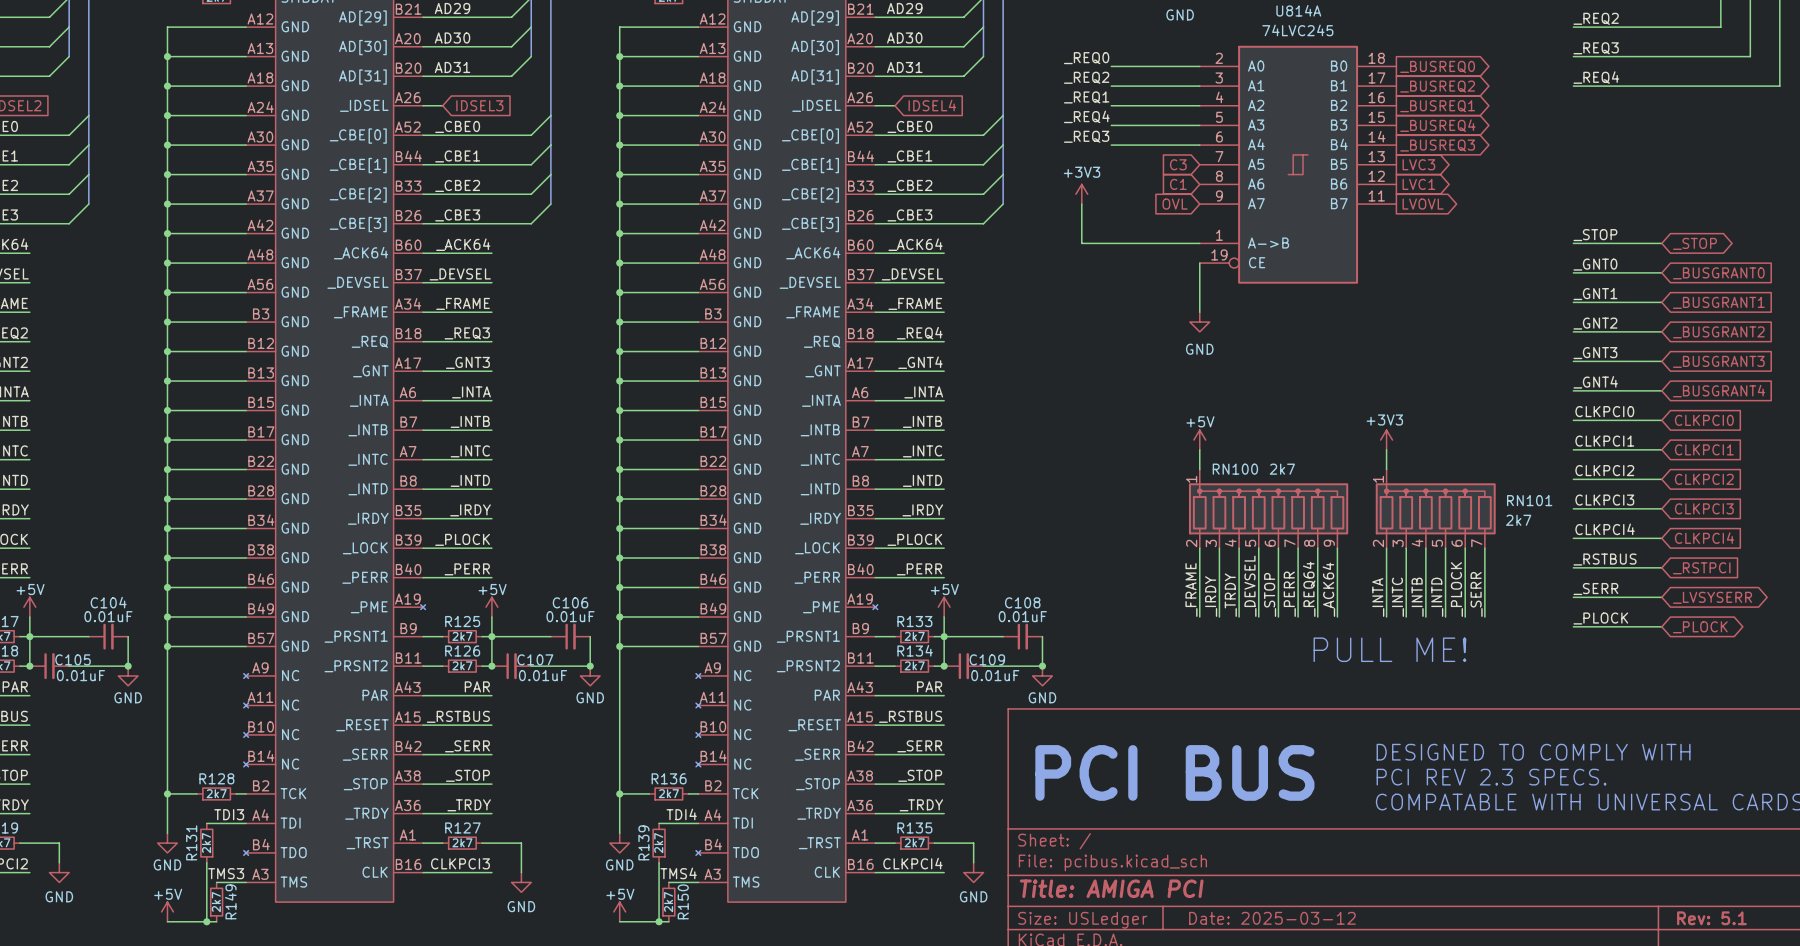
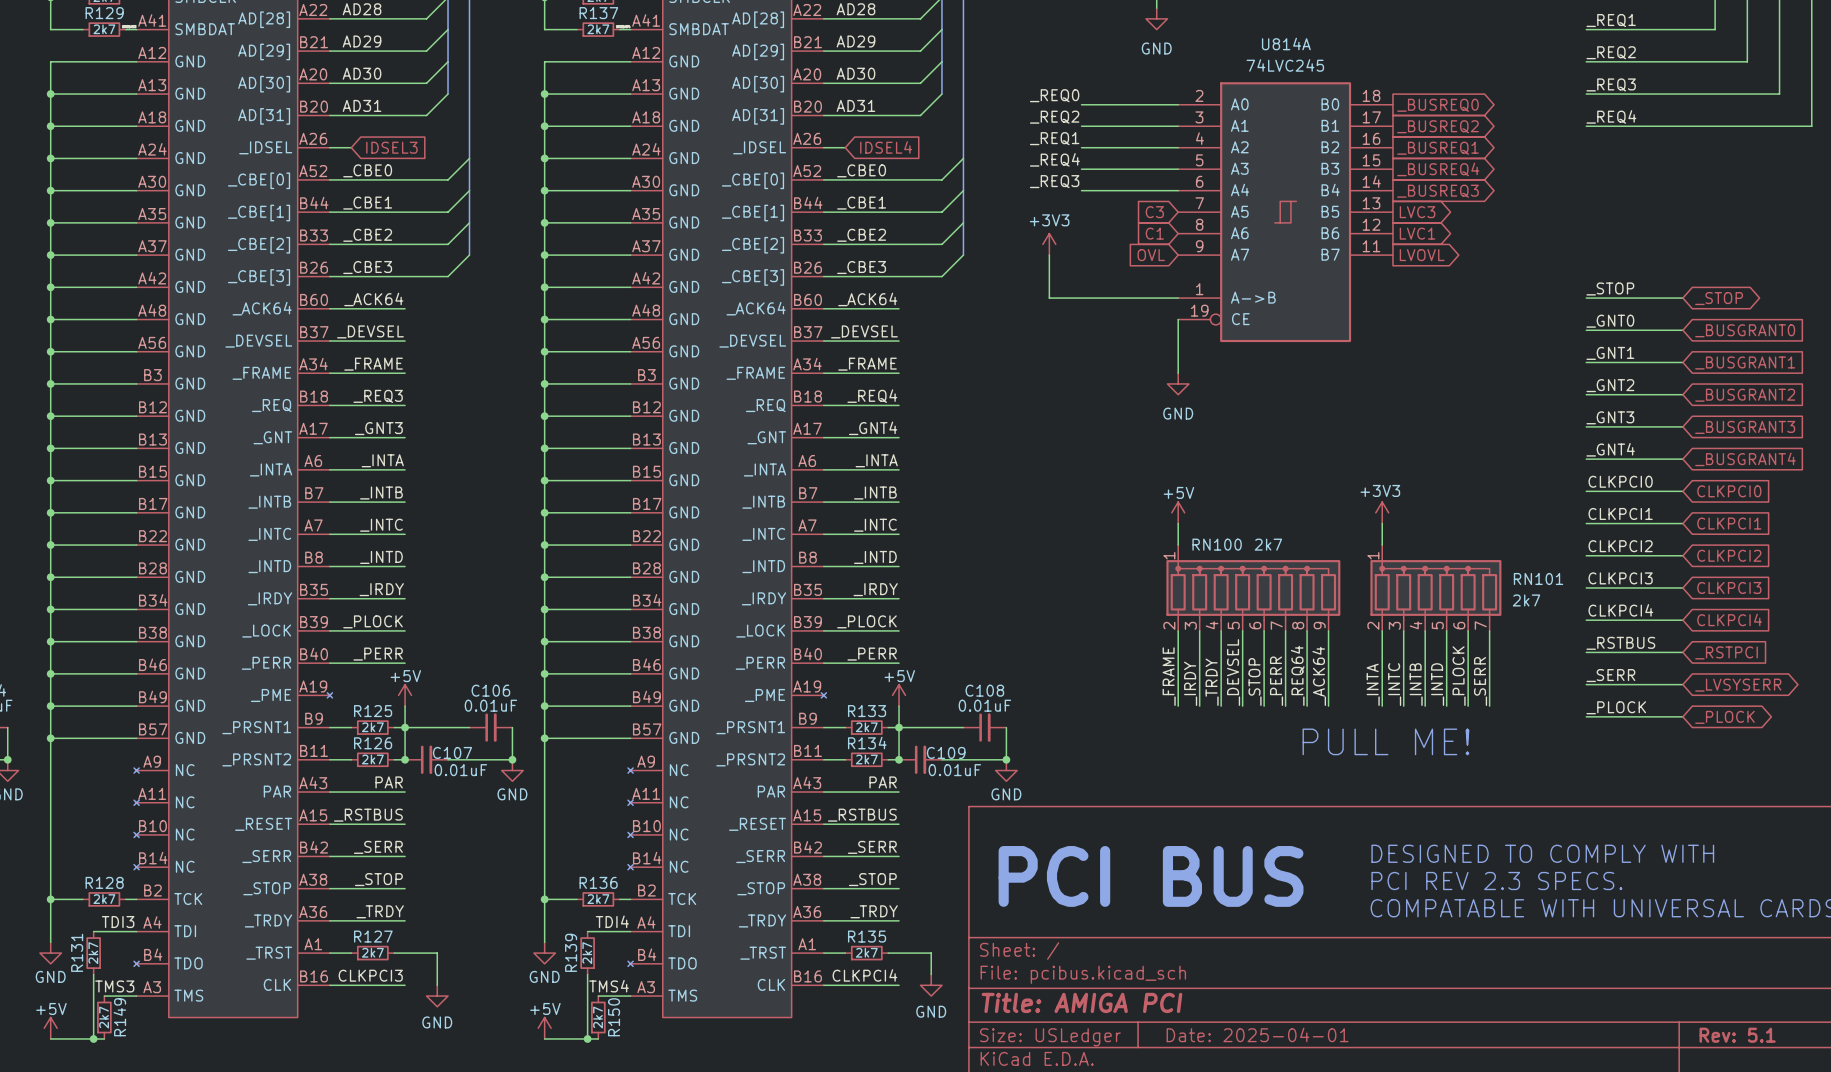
title block: Date: 2025-03-12 (1272, 918) -> Date: 2025-04-01 (1257, 1034)

